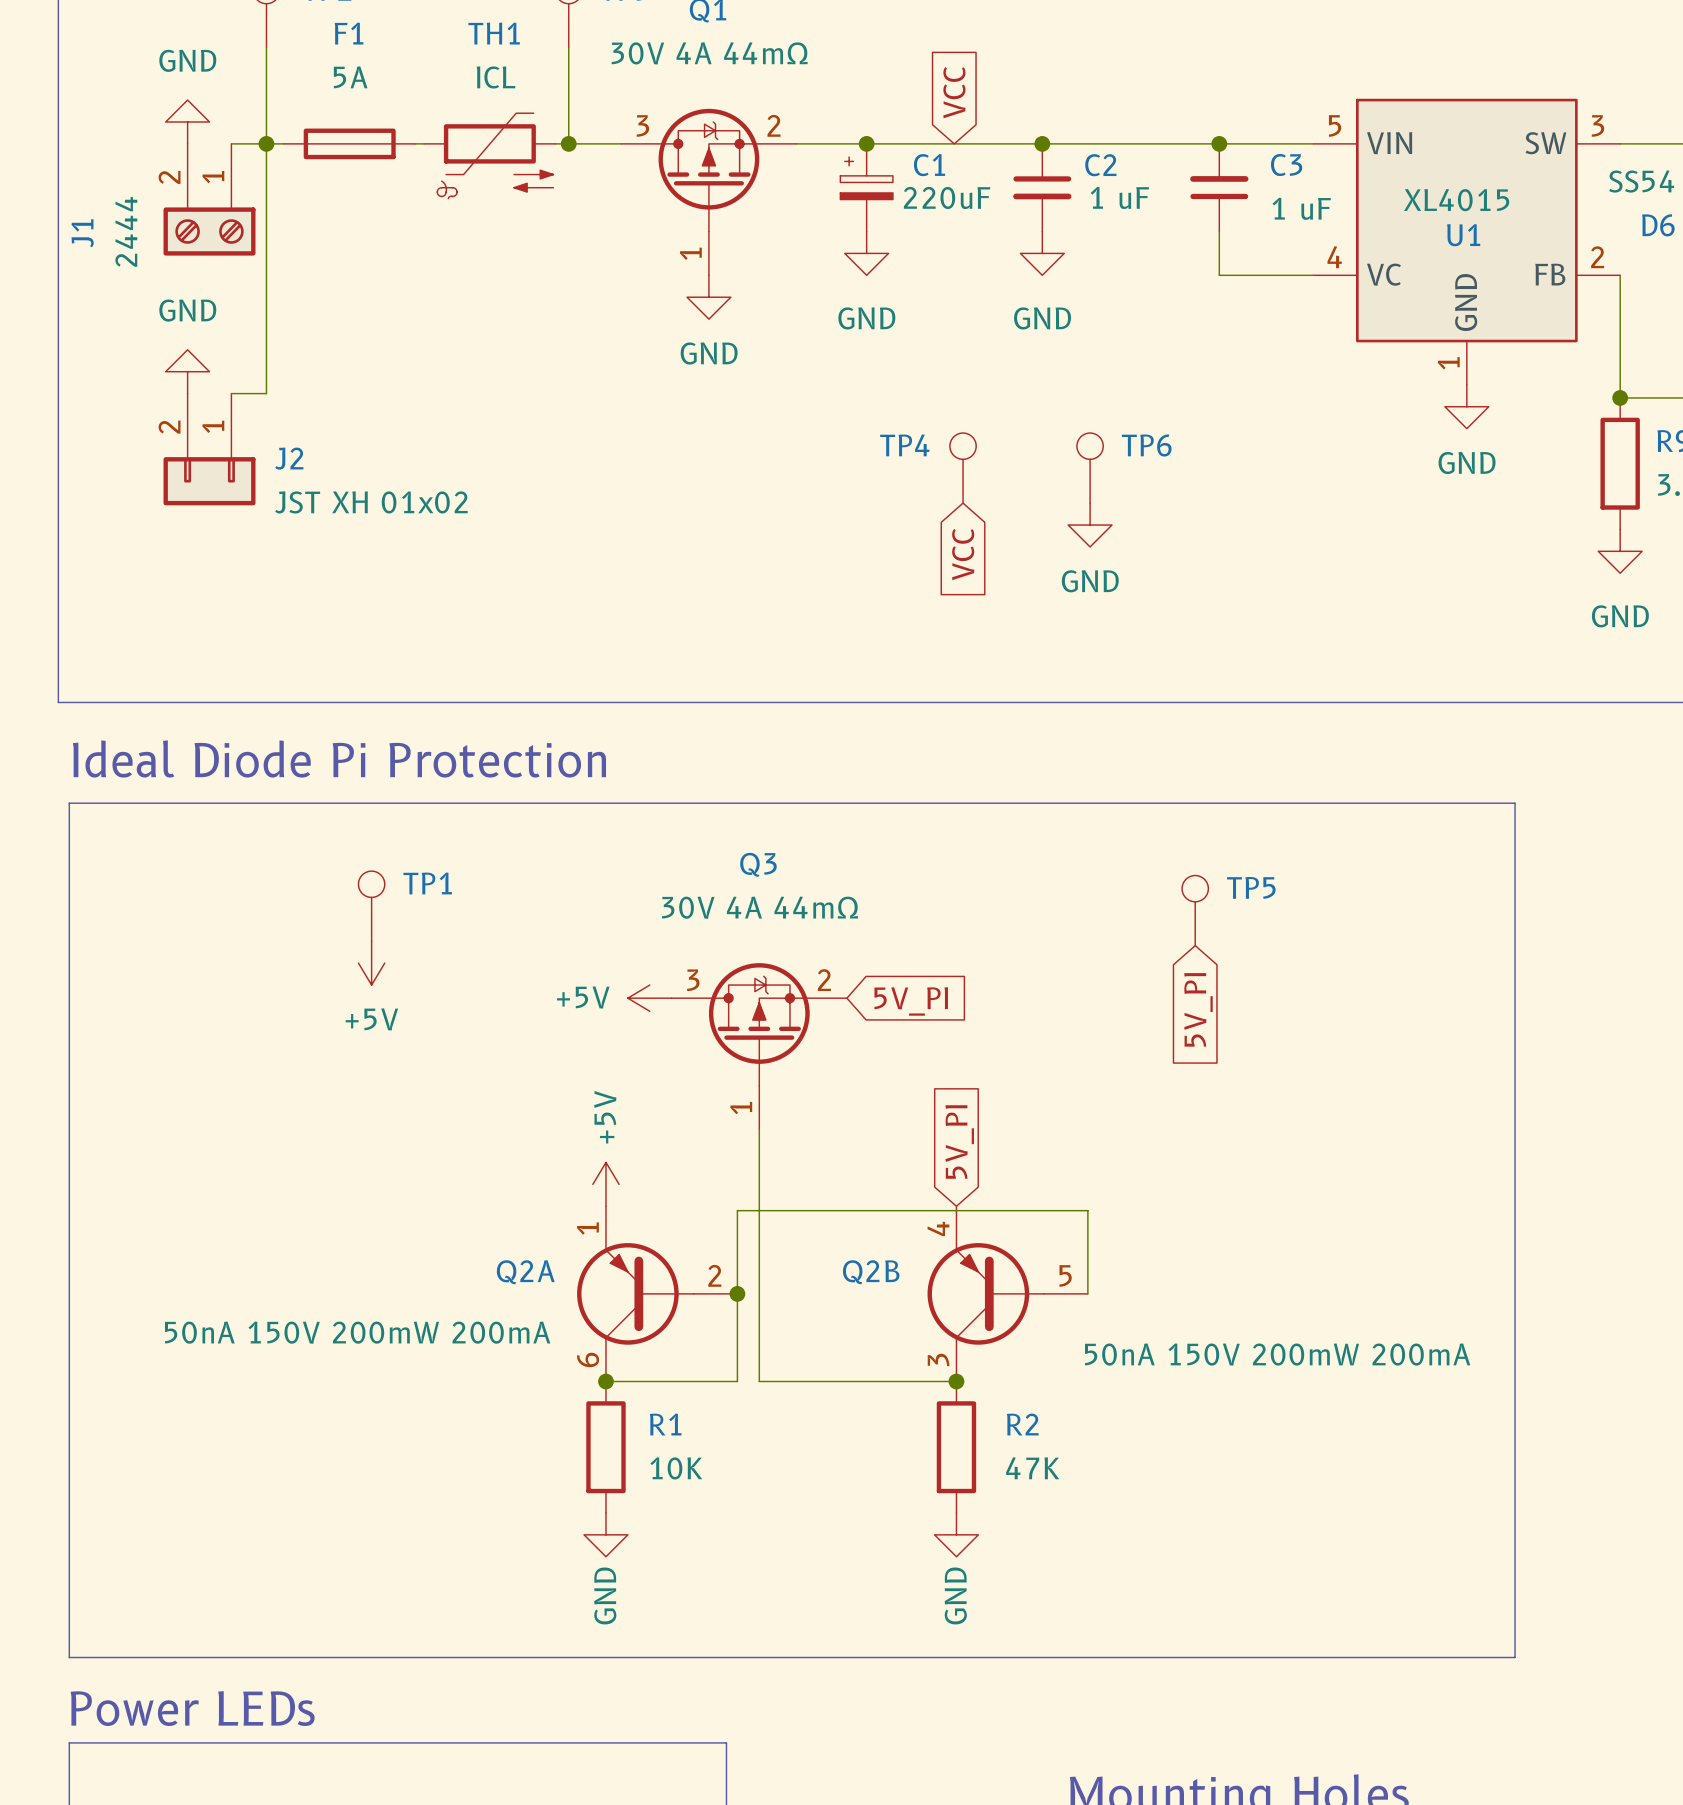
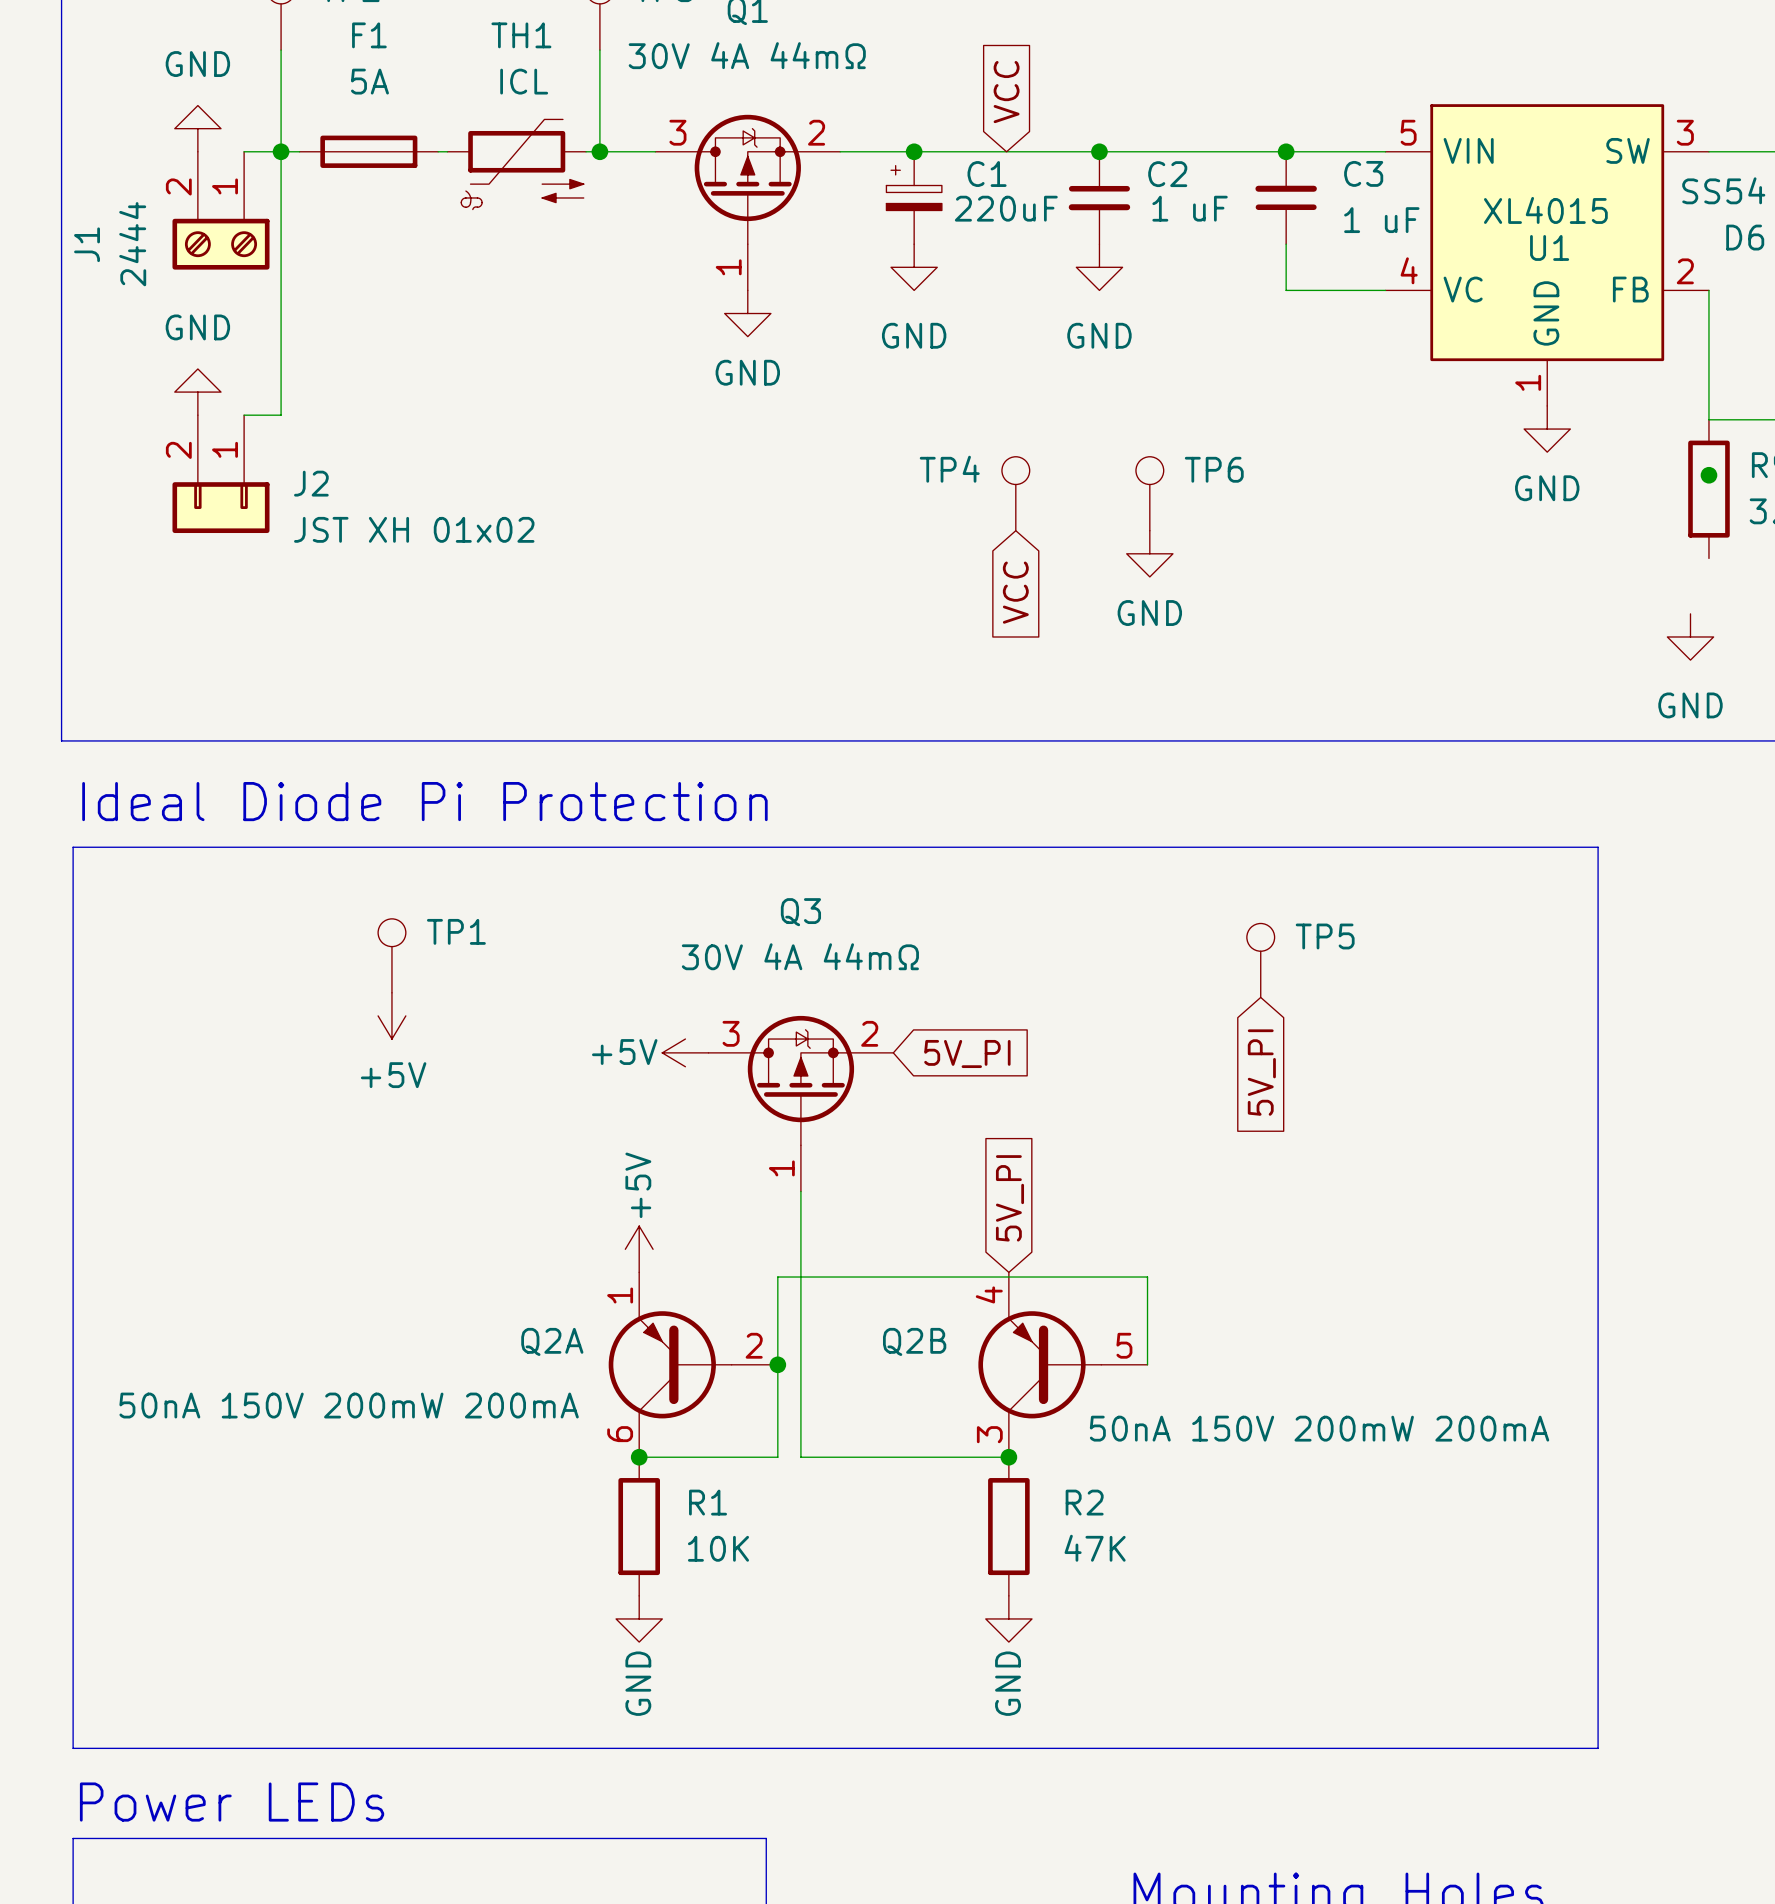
junction: (1620, 397) -> none
junction: none -> (1708, 475)
power symbol position: GND (1620, 551) -> GND (1690, 636)

